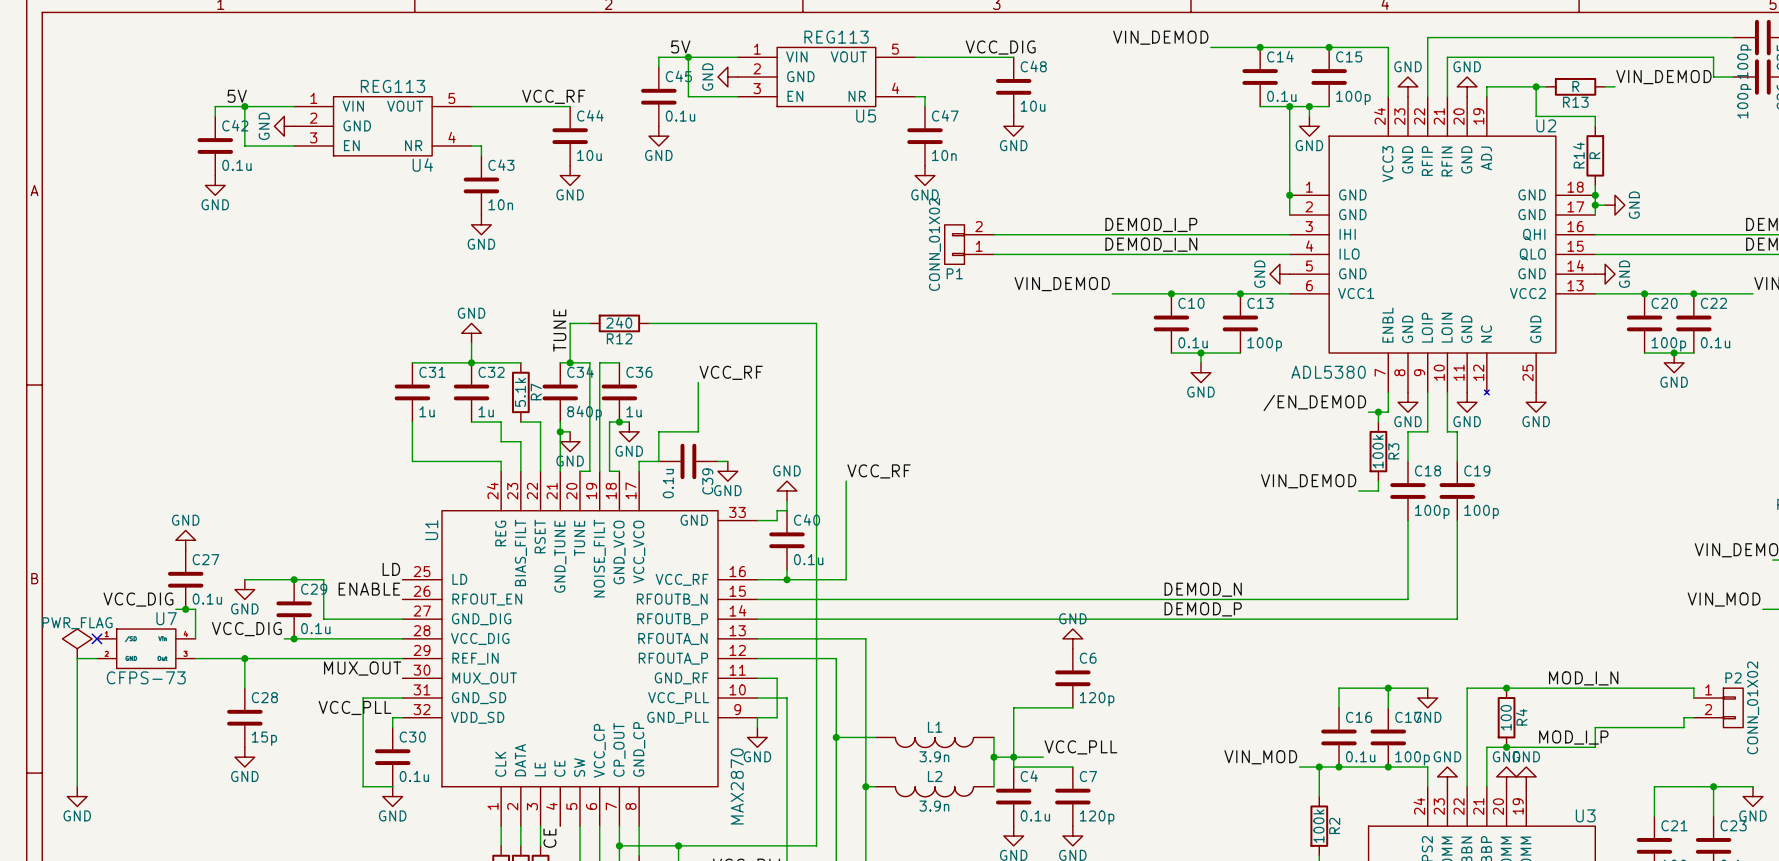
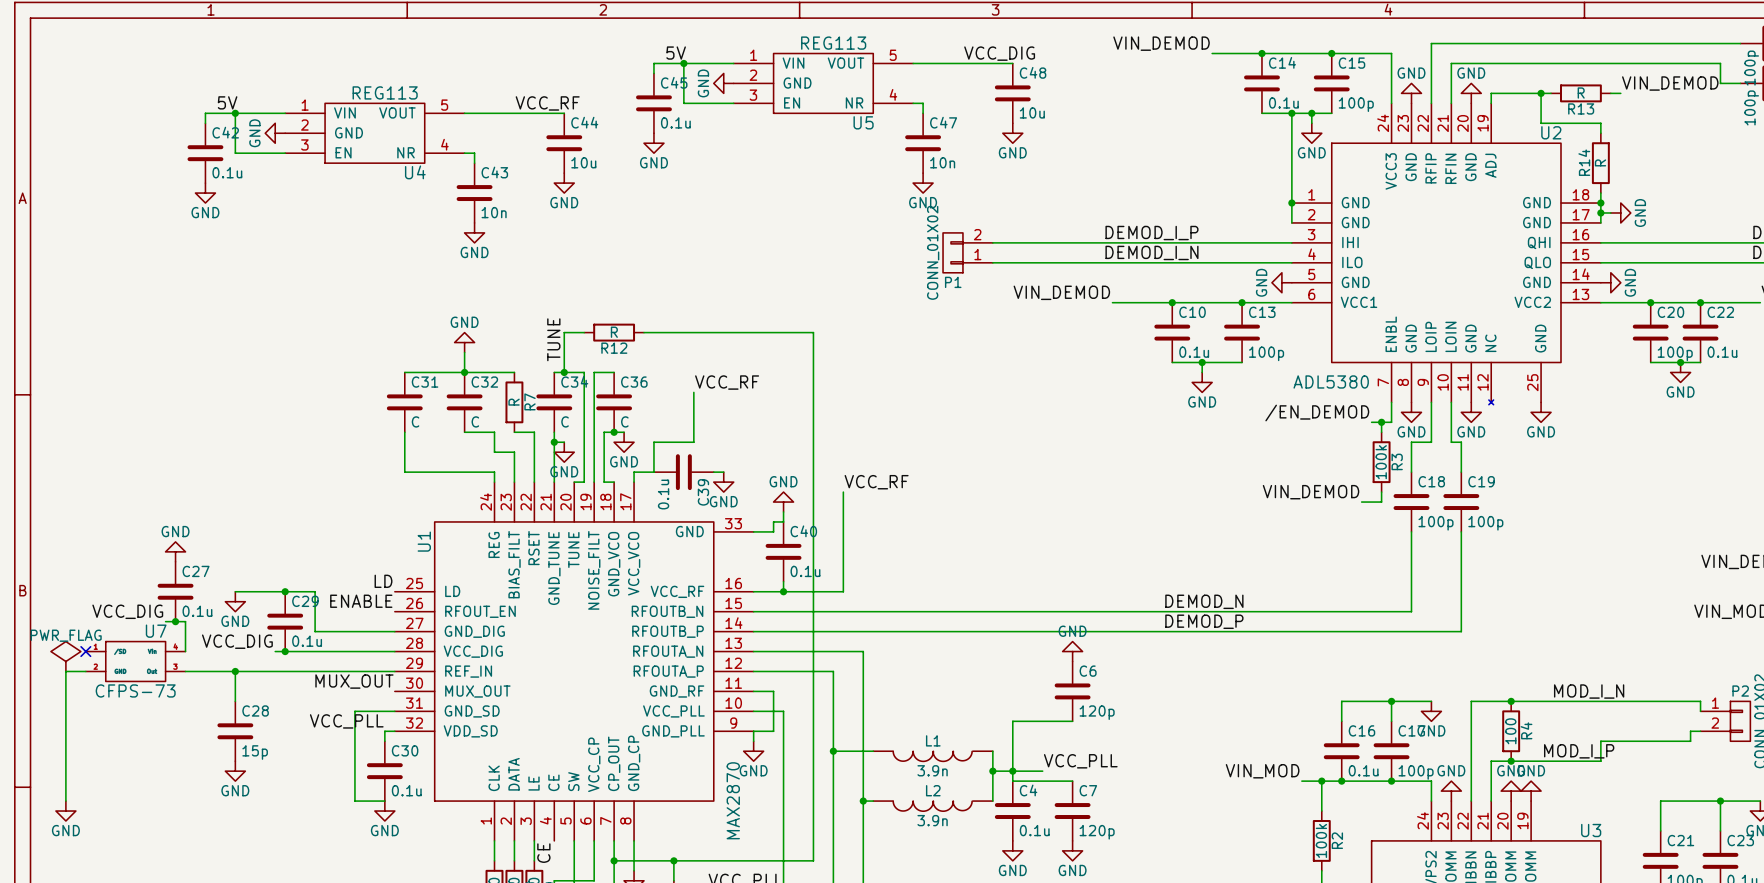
R12 value: 240 (619, 322) -> R (614, 332)
R7 value: 5.1k (520, 392) -> R (514, 402)
C31 value: 1u (427, 411) -> C (415, 421)
C32 value: 1u (486, 411) -> C (475, 421)
C36 value: 1u (634, 411) -> C (624, 421)
C34 value: 840p (584, 413) -> C (565, 421)

